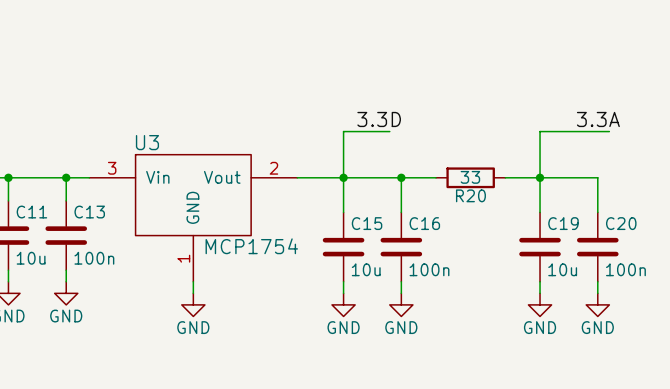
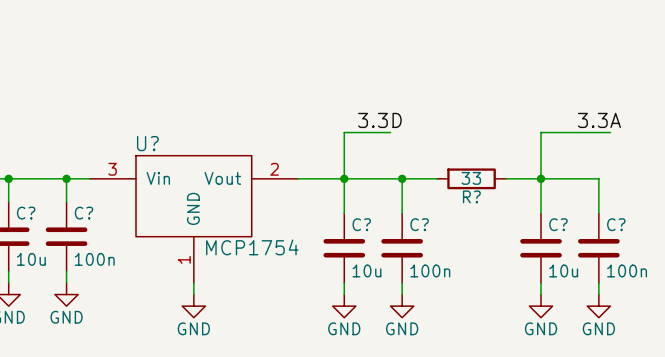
U3 name: U3 (147, 142) -> U? (147, 143)
R20 name: R20 (470, 195) -> R? (471, 196)
C11 name: C11 (31, 212) -> C? (26, 213)
C13 name: C13 (89, 212) -> C? (84, 213)
C15 name: C15 (367, 223) -> C? (361, 224)
C16 name: C16 (424, 223) -> C? (419, 224)
C19 name: C19 (563, 223) -> C? (558, 224)
C20 name: C20 (621, 223) -> C? (616, 224)

